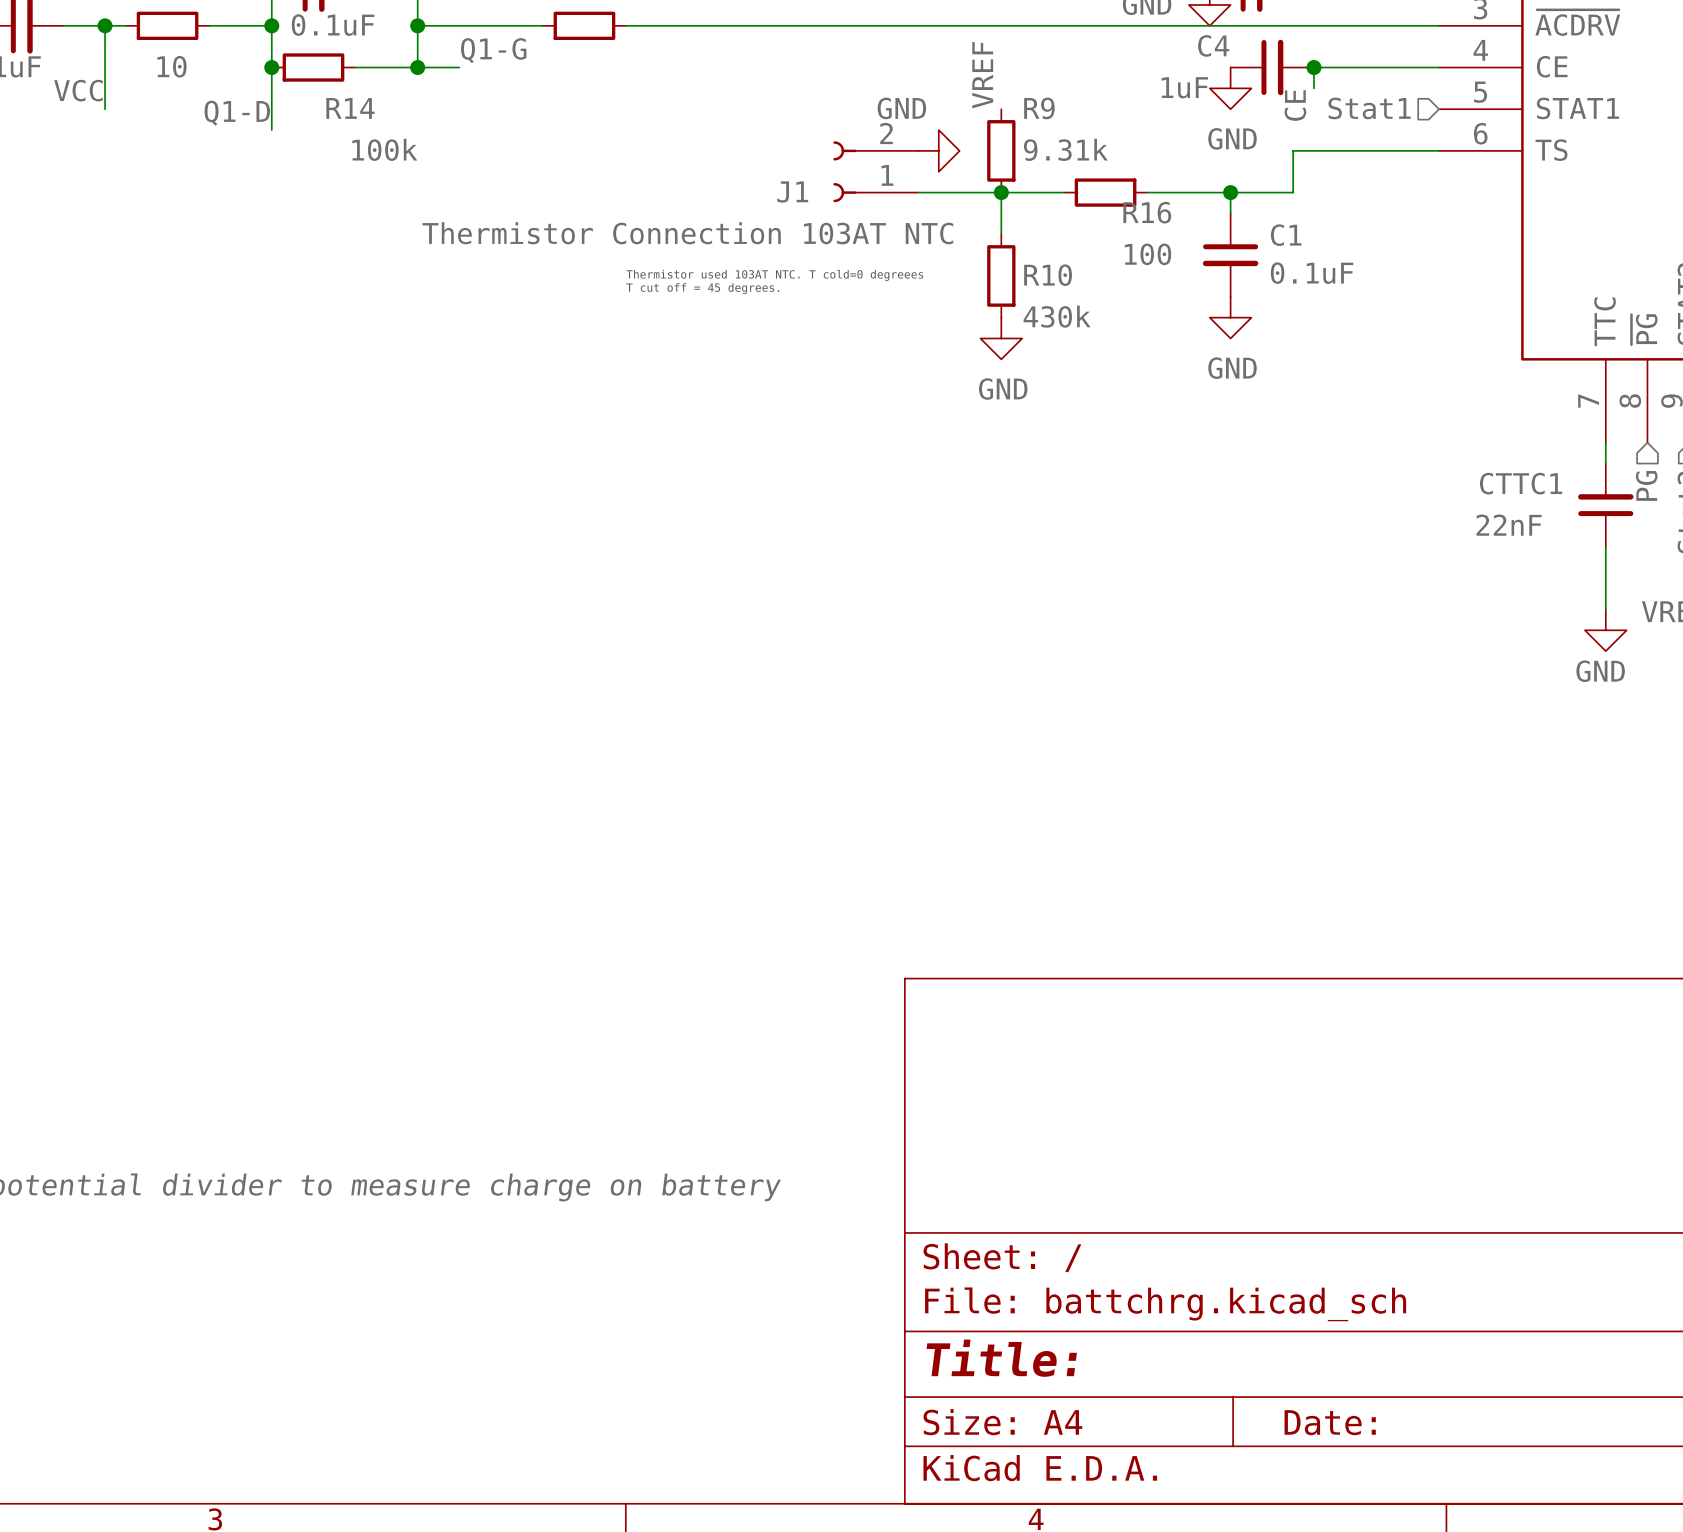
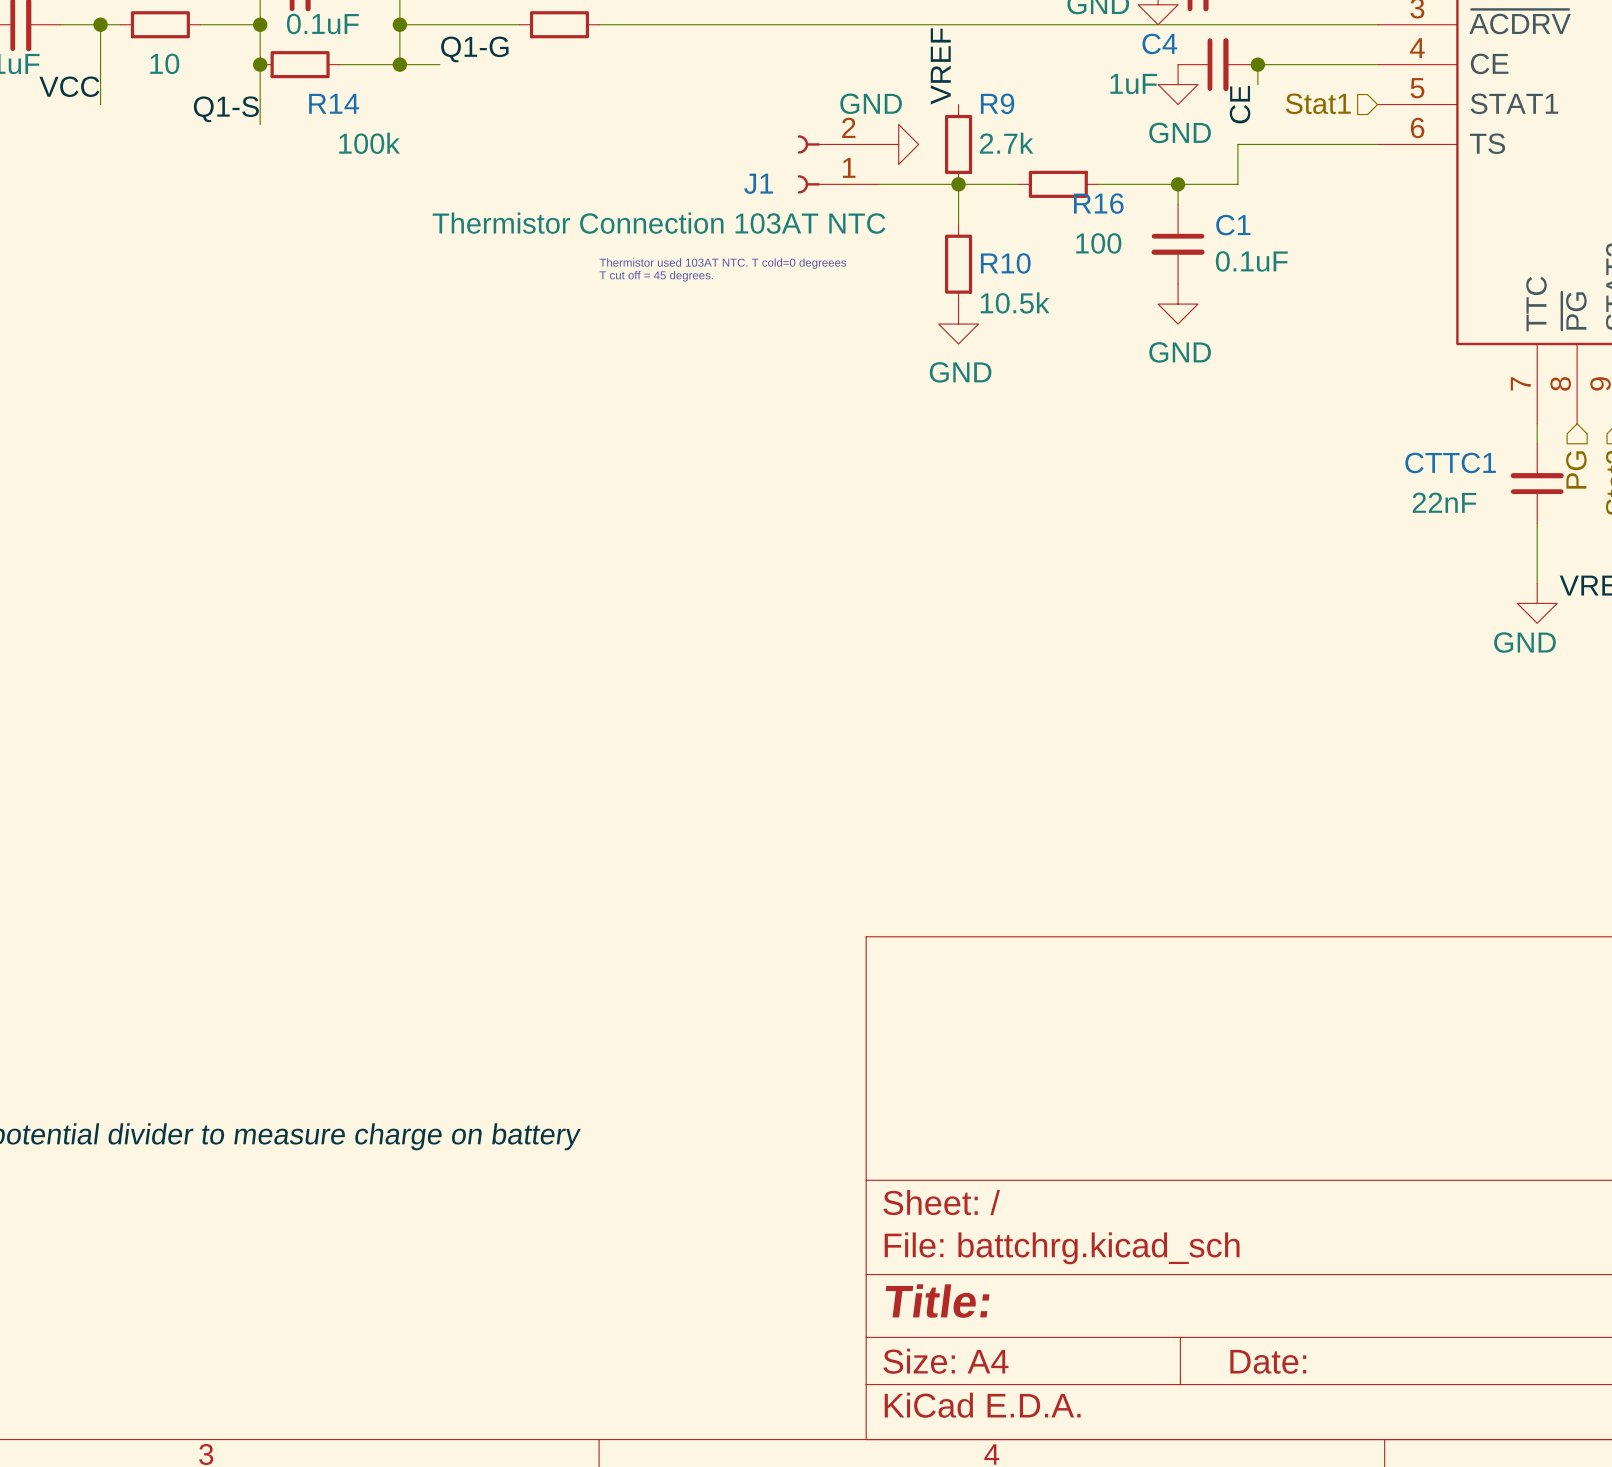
label: Q1-D (237, 113) -> Q1-S (226, 109)
R9 value: 9.31k (1065, 149) -> 2.7k (1006, 143)
R10 value: 430k (1057, 316) -> 10.5k (1015, 302)

